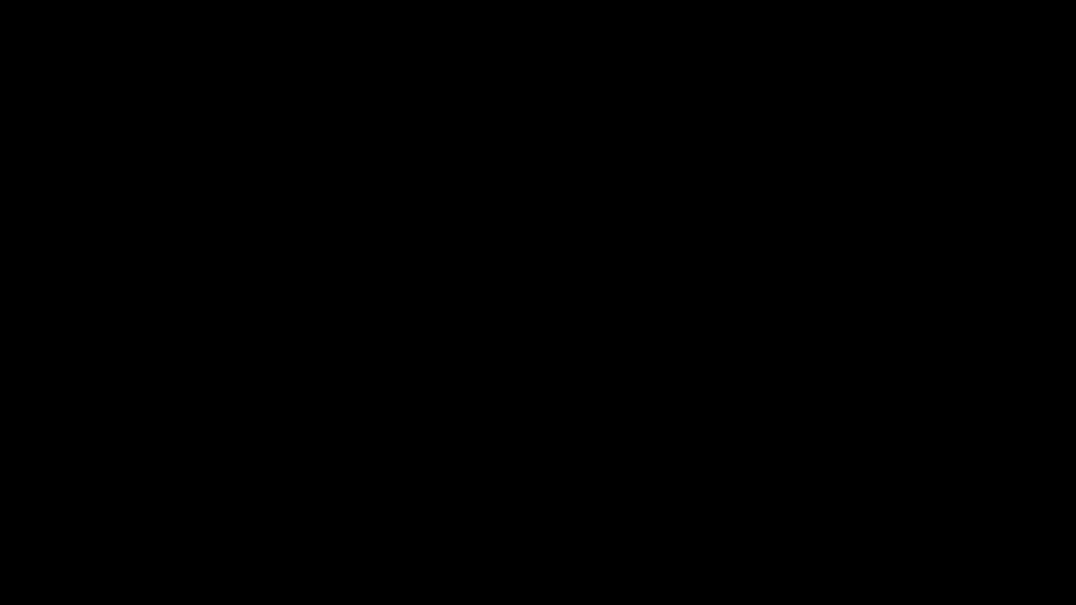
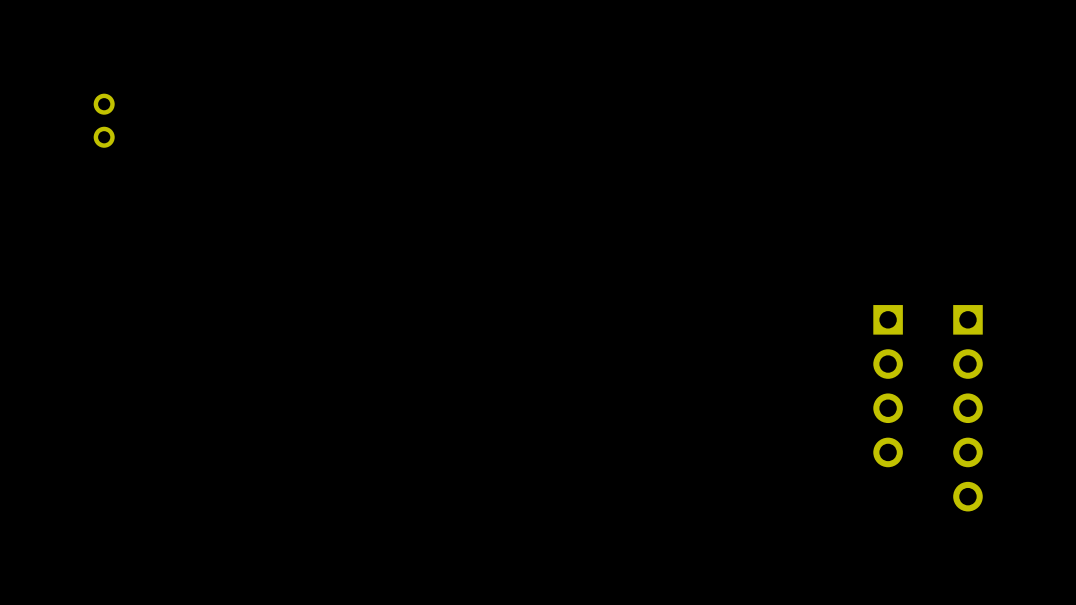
part: none -> (104, 120)
part: none -> (888, 386)
part: none -> (967, 408)

